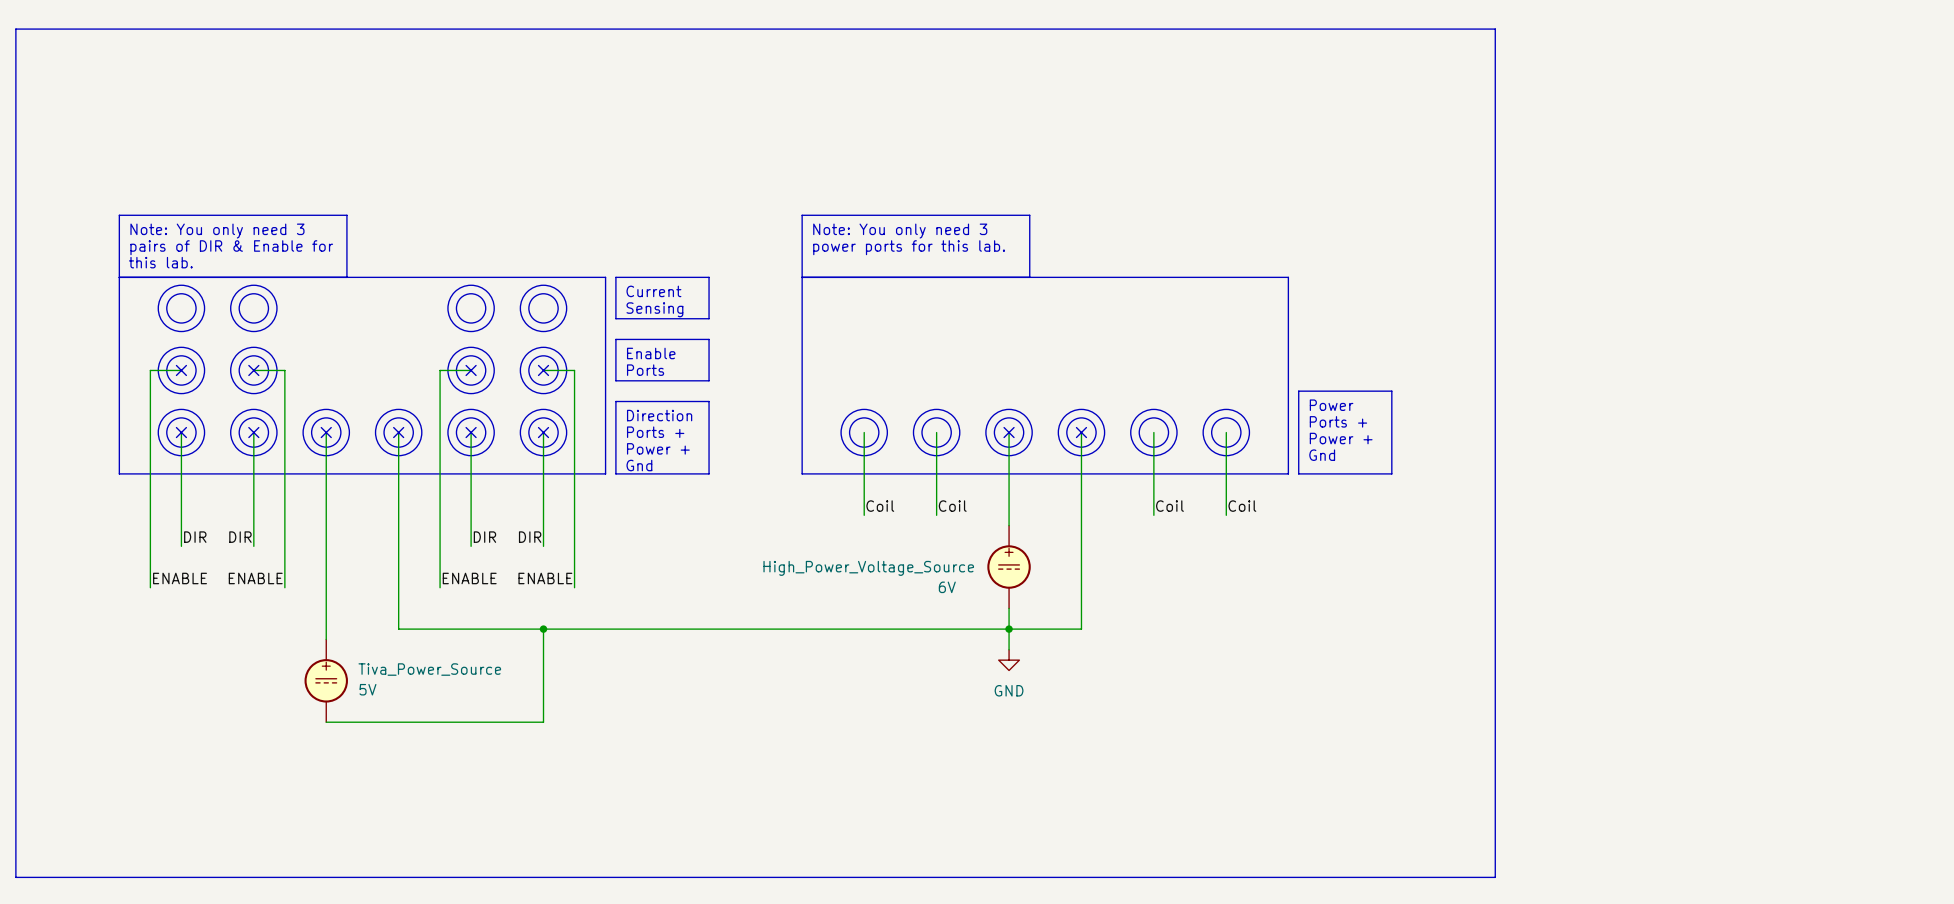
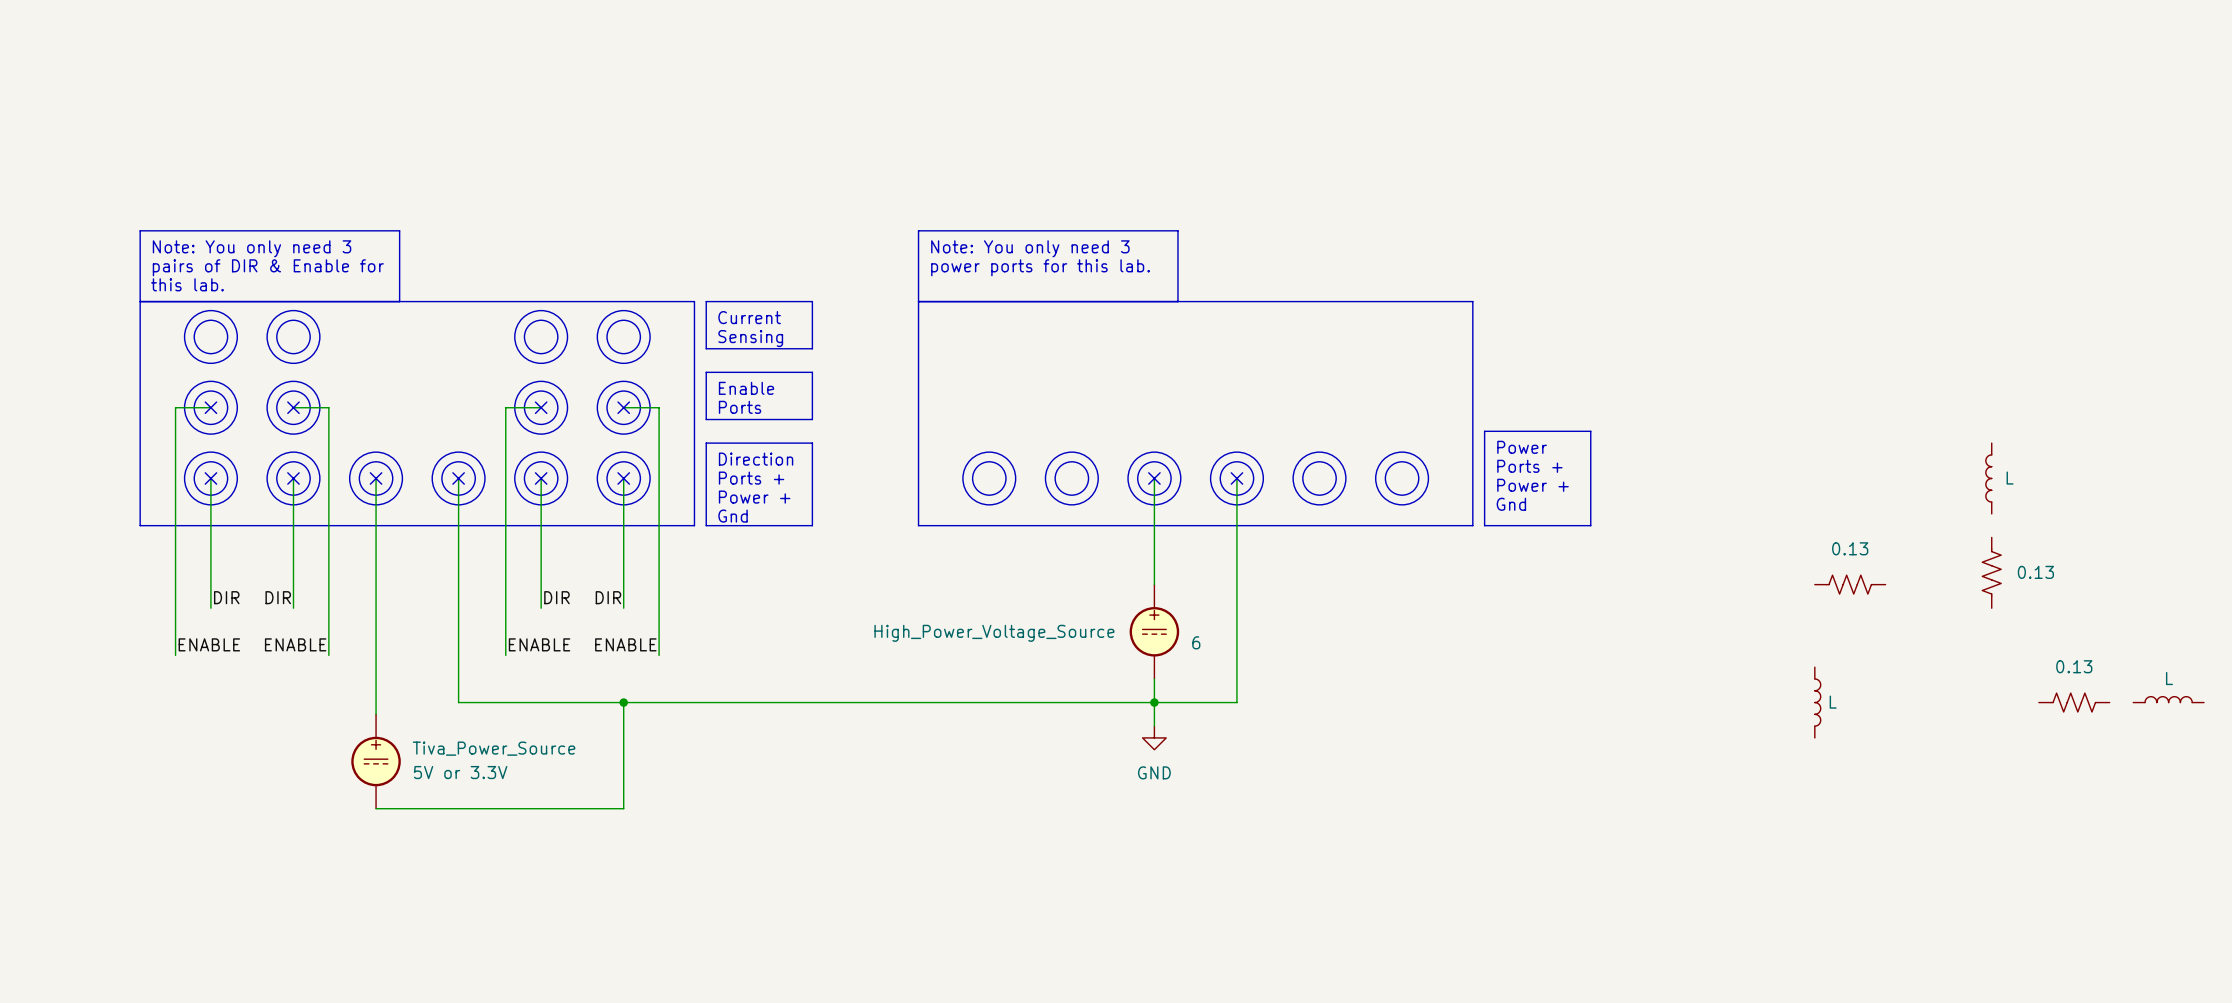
line: (15, 29) (1495, 29) (1495, 877) (15, 877) (15, 29) -> none
wire: (864, 432) (864, 515) -> none
wire: (936, 432) (936, 515) -> none
wire: (1153, 432) (1153, 515) -> none
wire: (1226, 432) (1226, 515) -> none
part: none -> L (1988, 478)
label: Coil (880, 506) -> none
label: Coil (952, 506) -> none
label: Coil (1169, 506) -> none
label: Coil (1242, 506) -> none
part: none -> 0.13 (1991, 572)
part: none -> 0.13 (1850, 584)
High_Power_Voltage_Source value: 6V (947, 587) -> 6 (1196, 642)
part: none -> L (2168, 699)
part: none -> L (1817, 702)
part: none -> 0.13 (2074, 702)
Tiva_Power_Source value: 5V (367, 689) -> 5V or 3.3V (460, 772)

